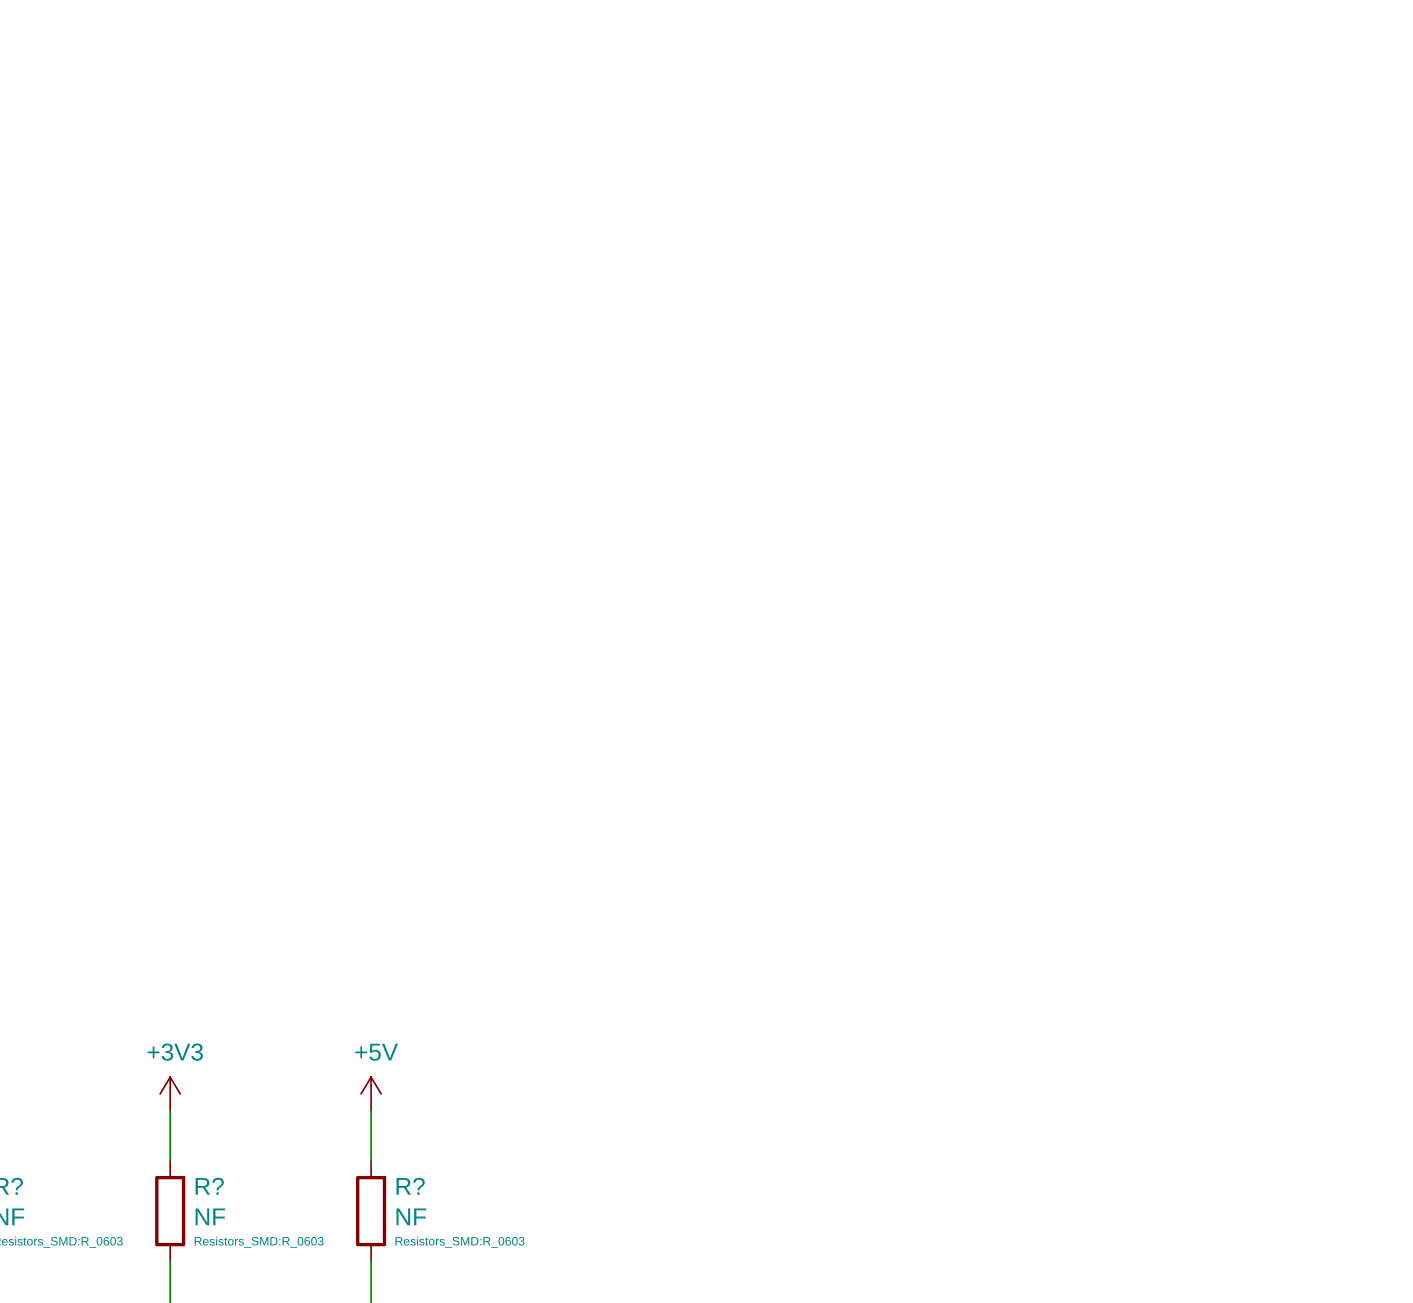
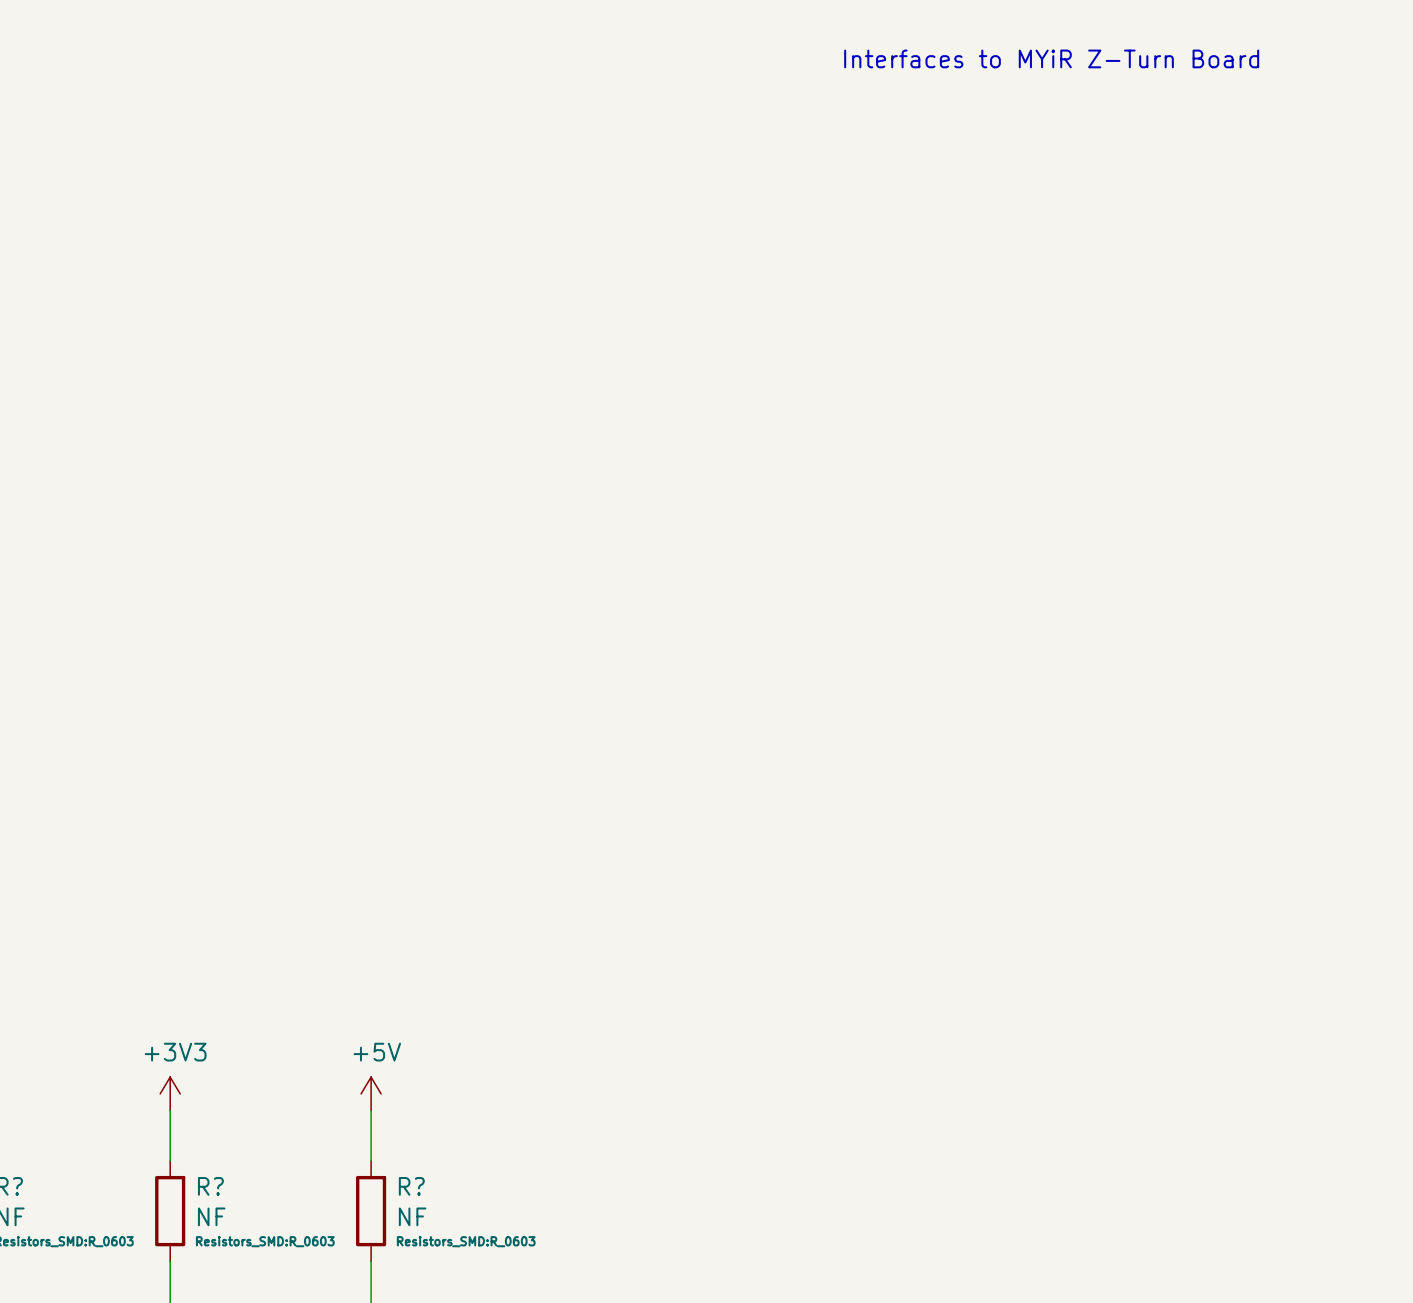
text: none -> Interfaces to MYiR Z-Turn Board (1051, 58)

